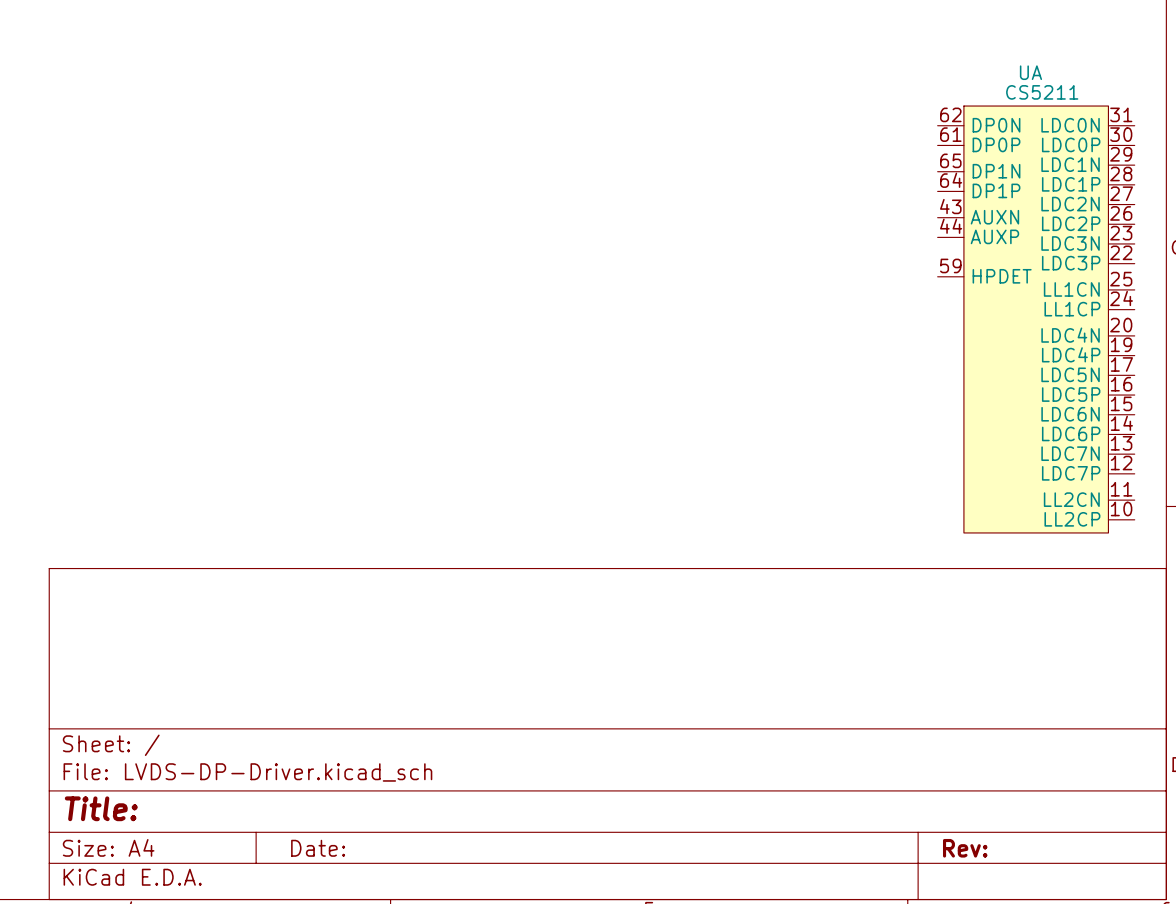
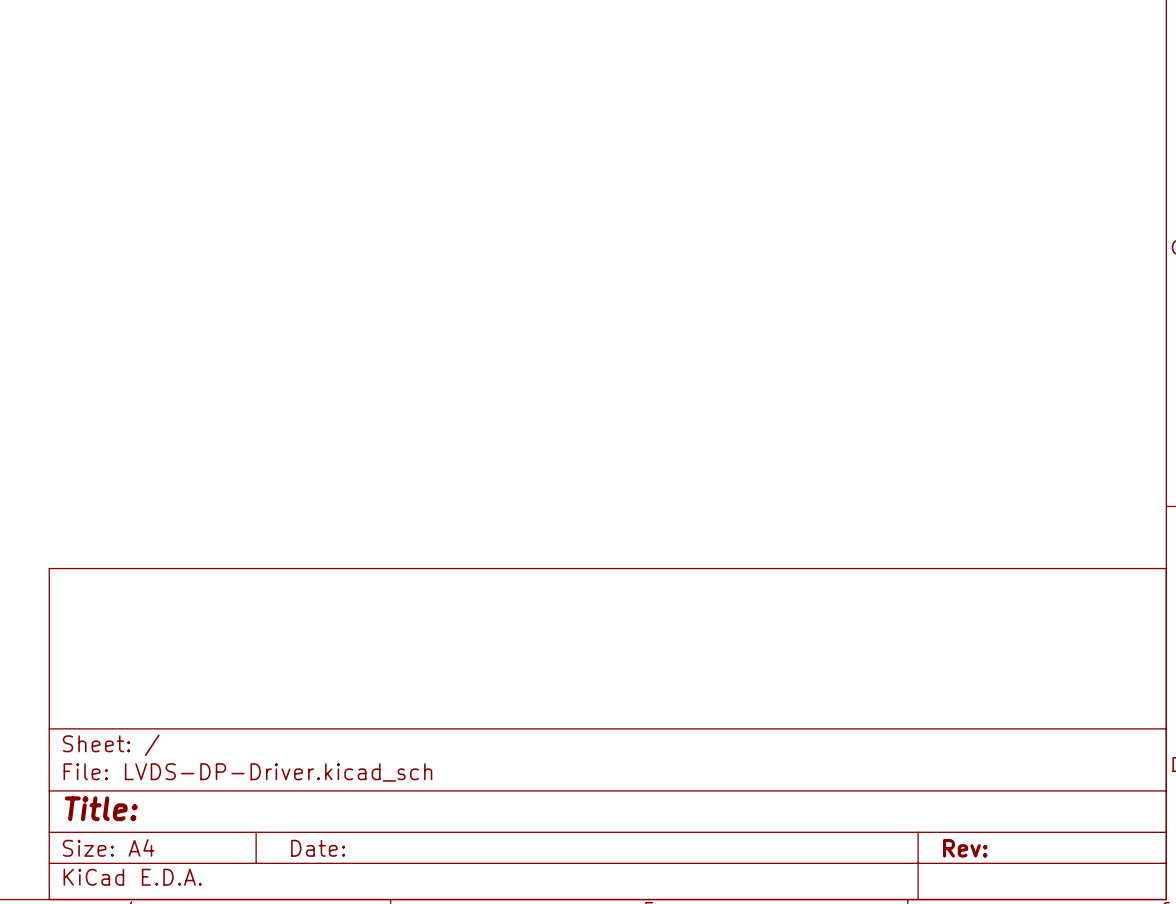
UA: CS5211 (1036, 319) -> none

